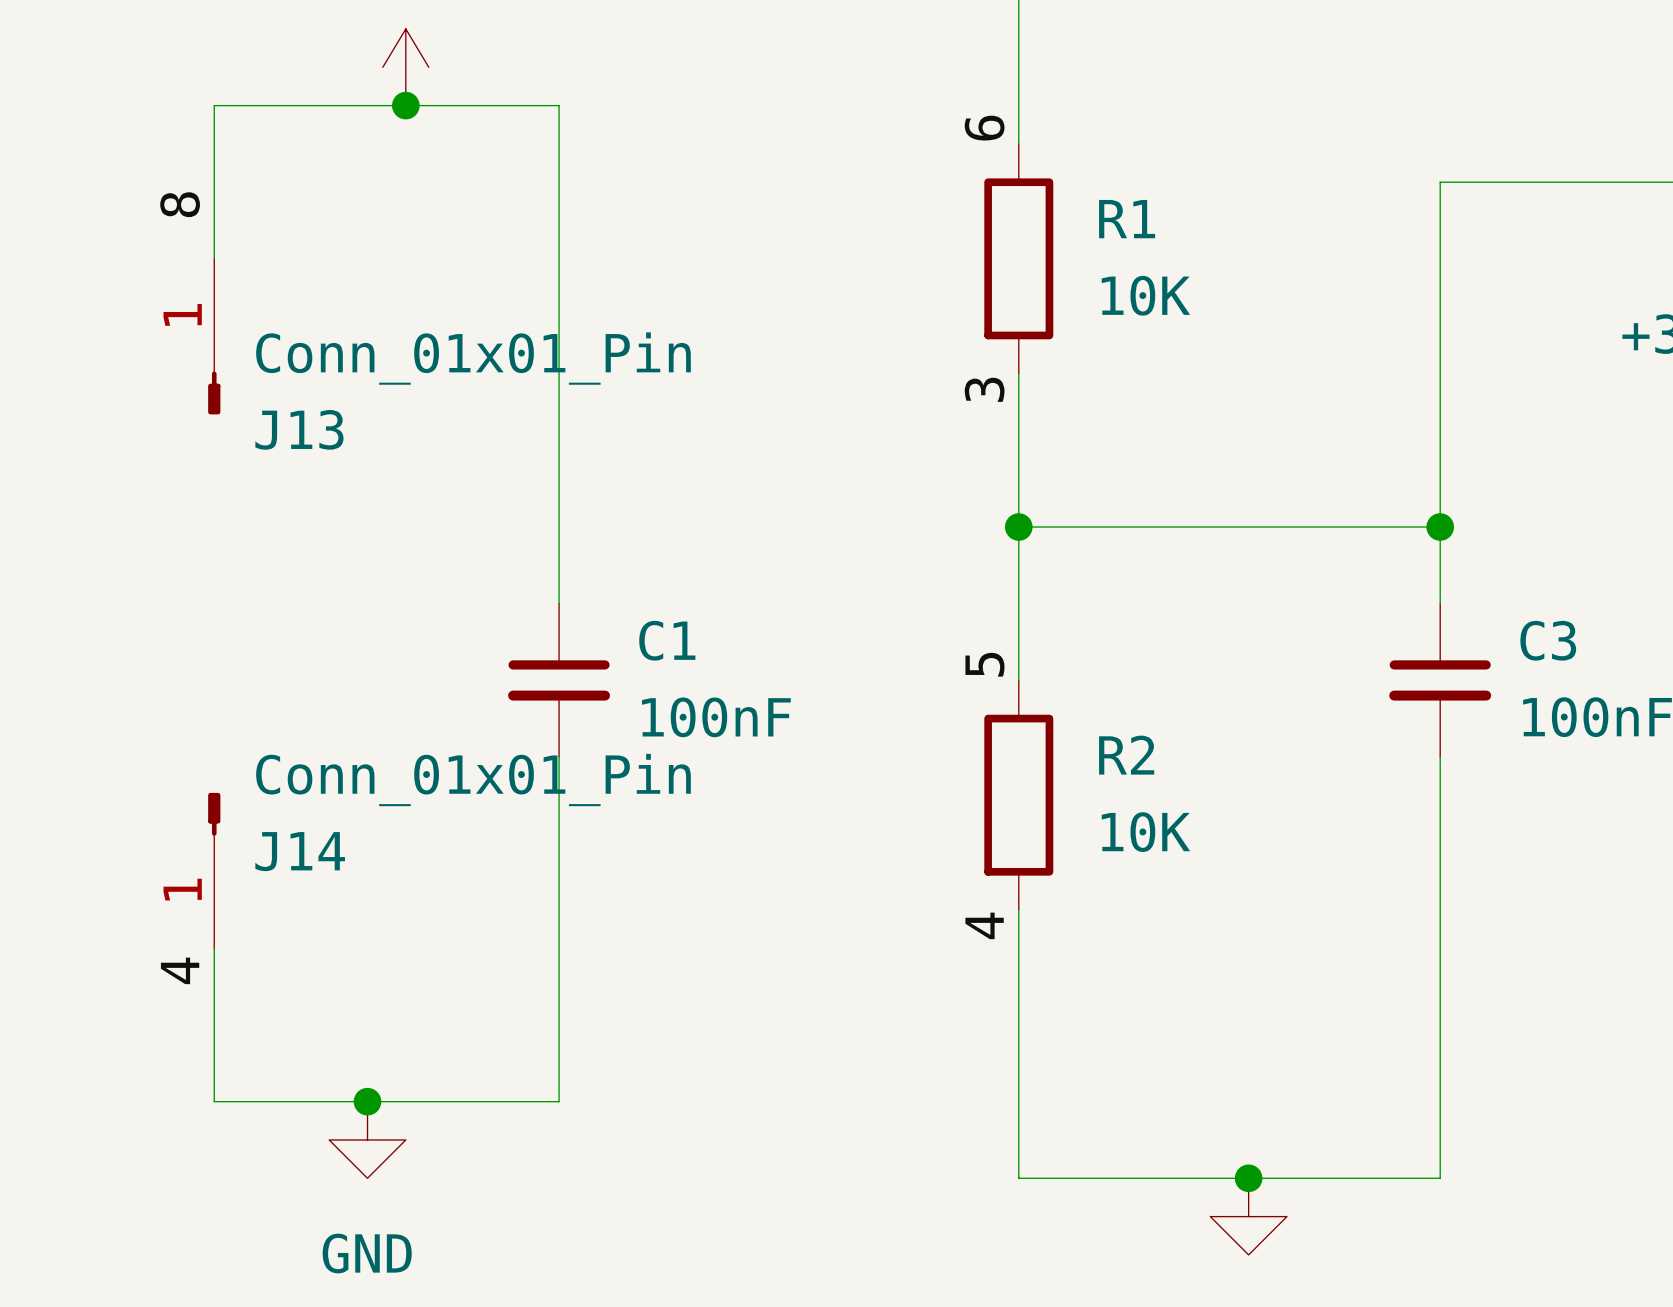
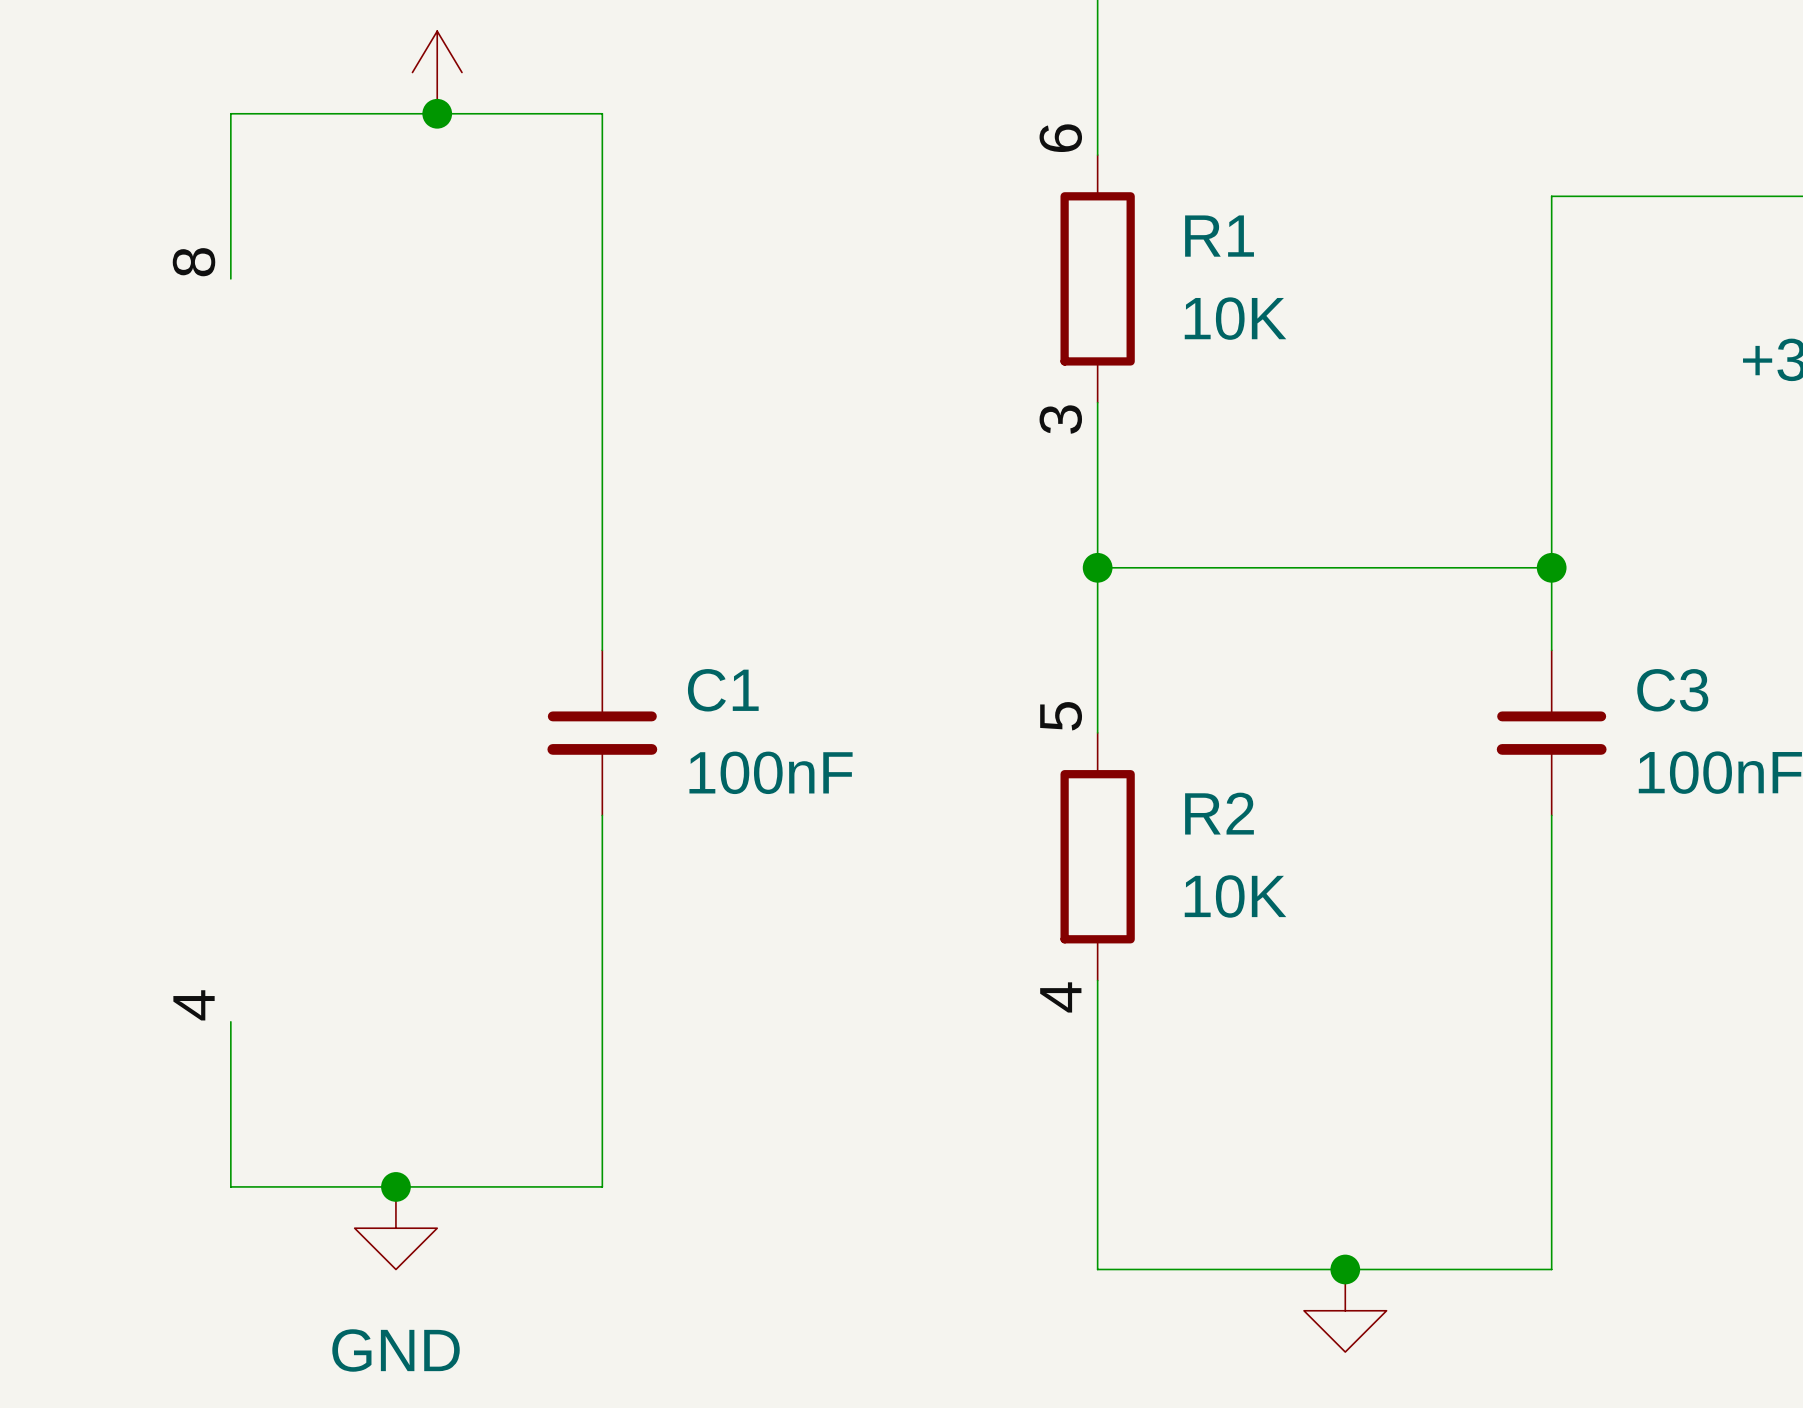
label position: 8 (180, 204) -> 8 (194, 262)
J13: Conn_01x01_Pin (214, 336) -> none
J14: Conn_01x01_Pin (214, 870) -> none
label position: 4 (180, 970) -> 4 (194, 1005)

